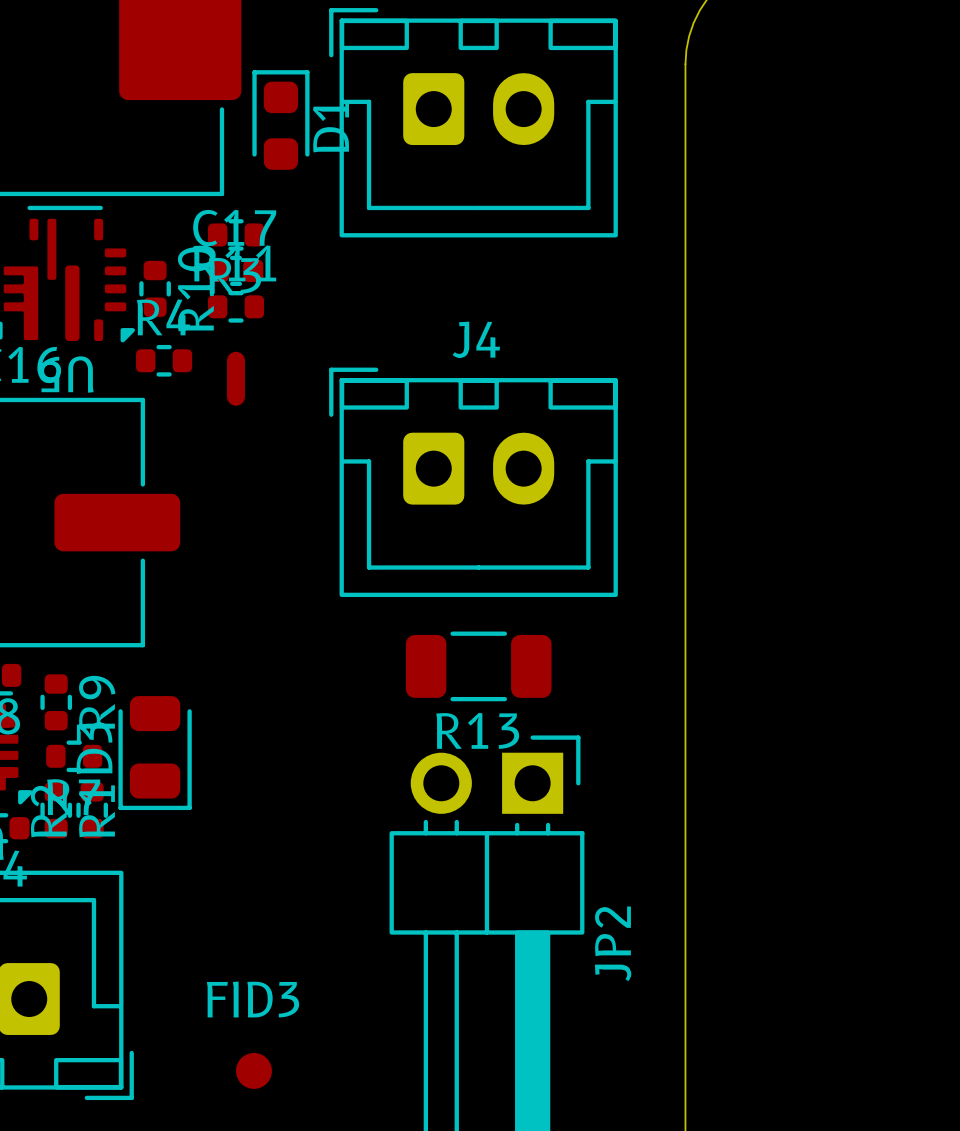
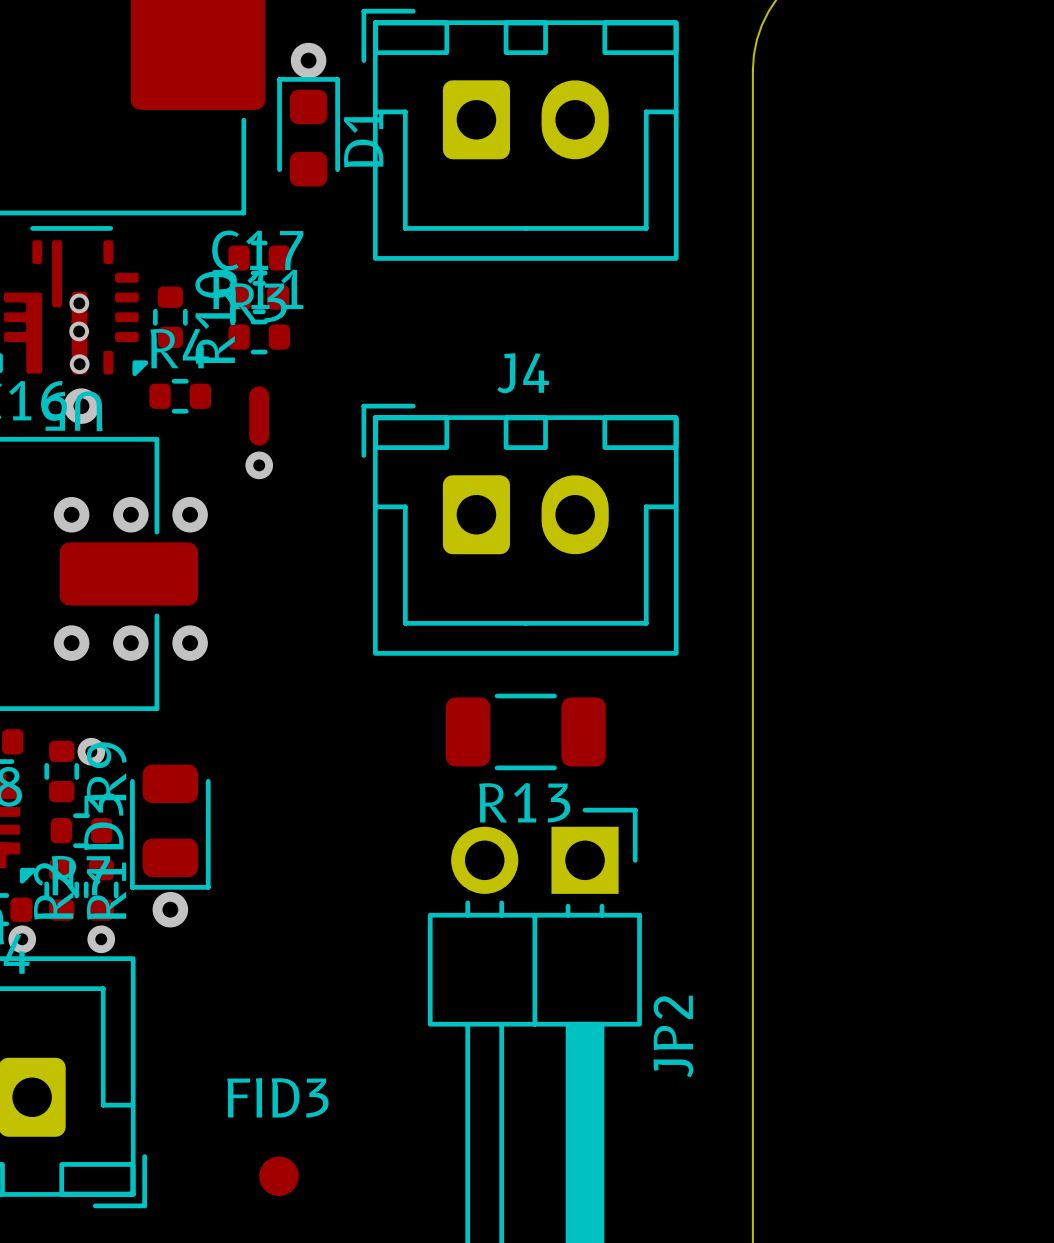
via: none -> (308, 60)
via: none -> (79, 303)
via: none -> (79, 331)
via: none -> (79, 364)
via: none -> (81, 406)
via: none -> (259, 465)
via: none -> (71, 514)
via: none -> (130, 514)
via: none -> (190, 514)
via: none -> (71, 643)
via: none -> (130, 643)
via: none -> (190, 643)
via: none -> (91, 751)
via: none -> (170, 909)
via: none -> (22, 939)
via: none -> (101, 939)

